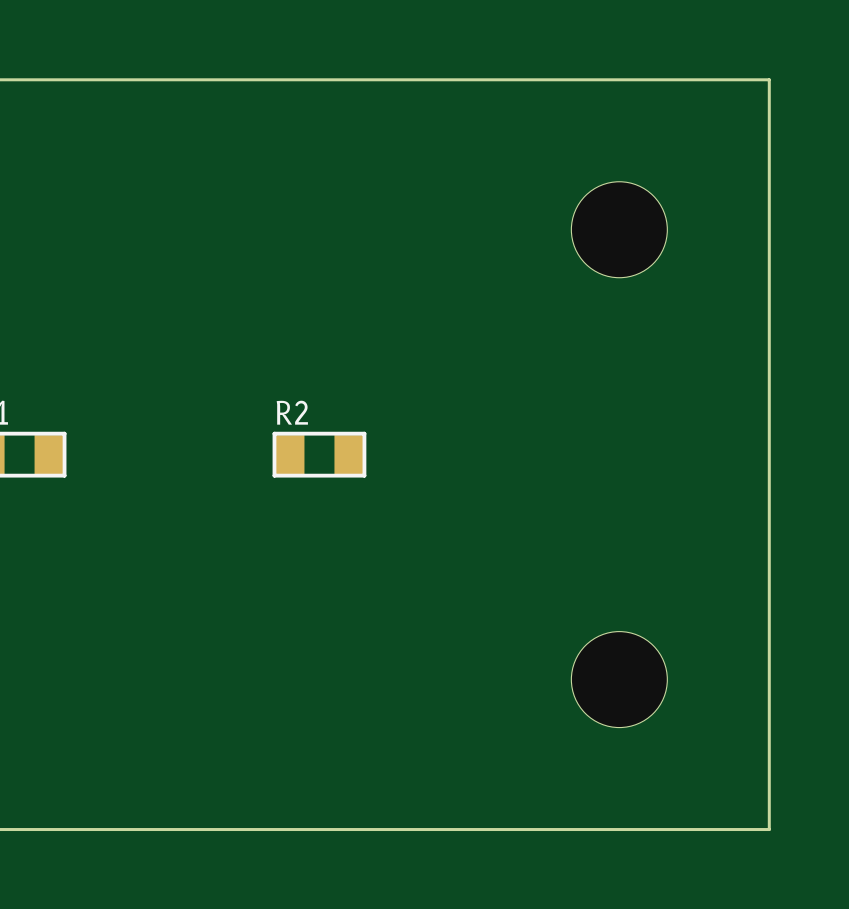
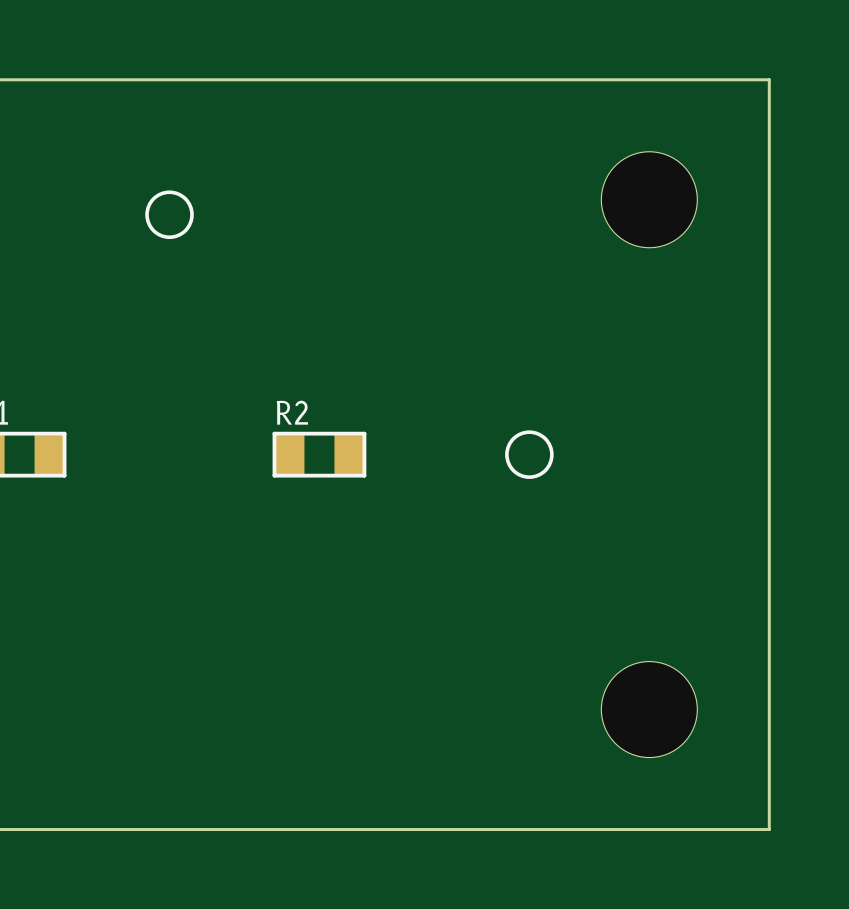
drawing: none -> [145, 190, 194, 240]
hole position: (619, 229) -> (649, 199)
drawing: none -> [505, 430, 554, 479]
hole position: (619, 679) -> (649, 709)

